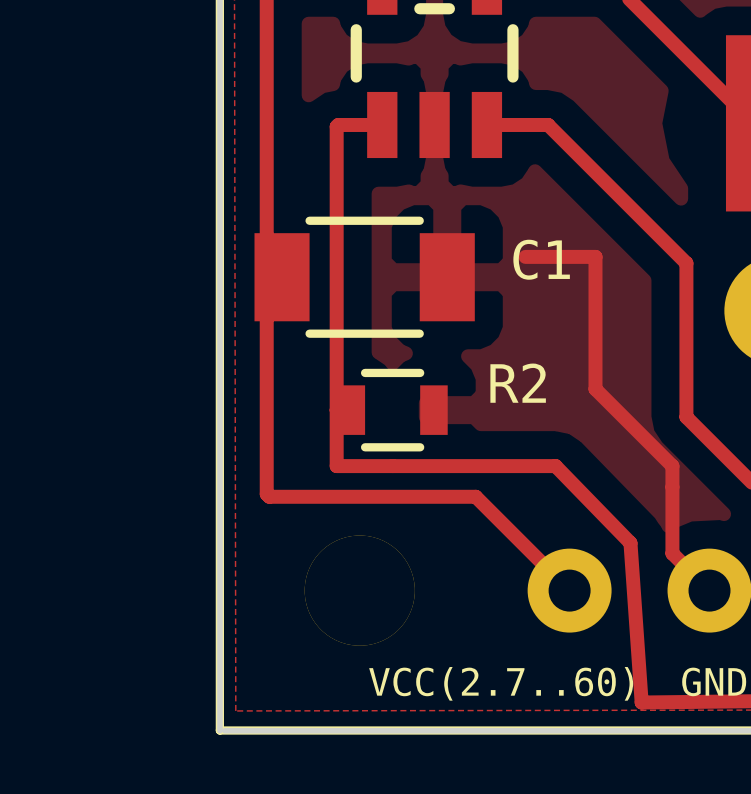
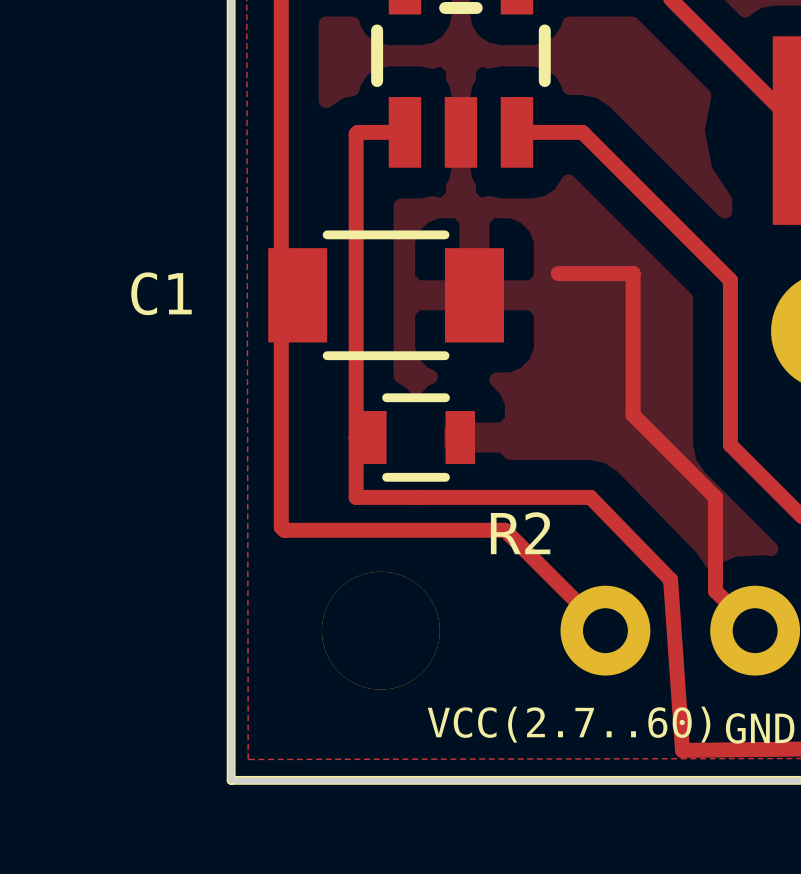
C1 name position: C1 (541, 259) -> C1 (161, 293)
R2 name position: R2 (518, 383) -> R2 (520, 533)
text position: VCC(2.7..60) (501, 683) -> VCC(2.7..60) (569, 724)

